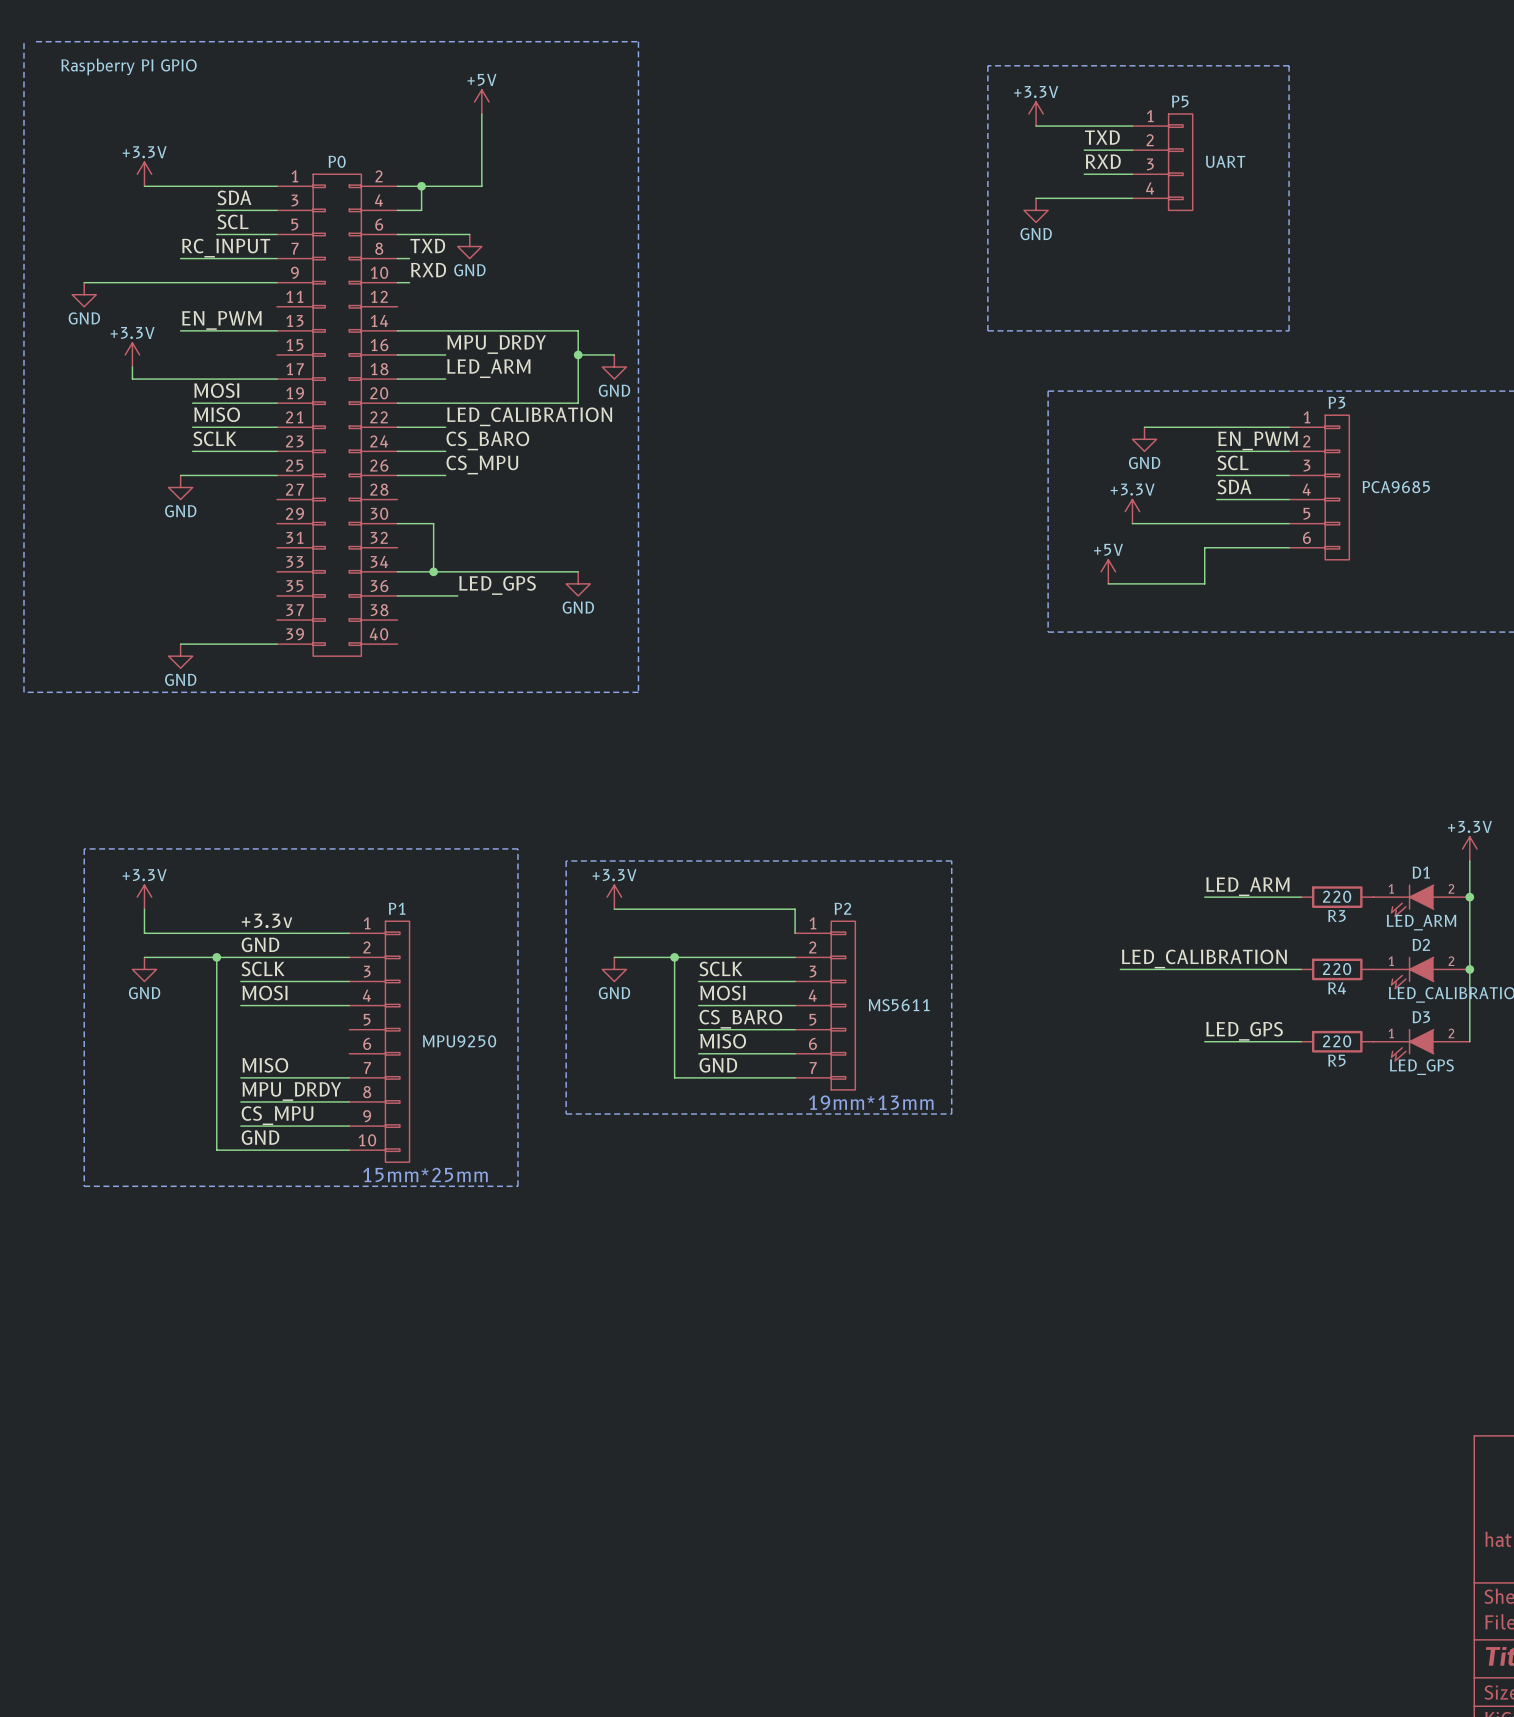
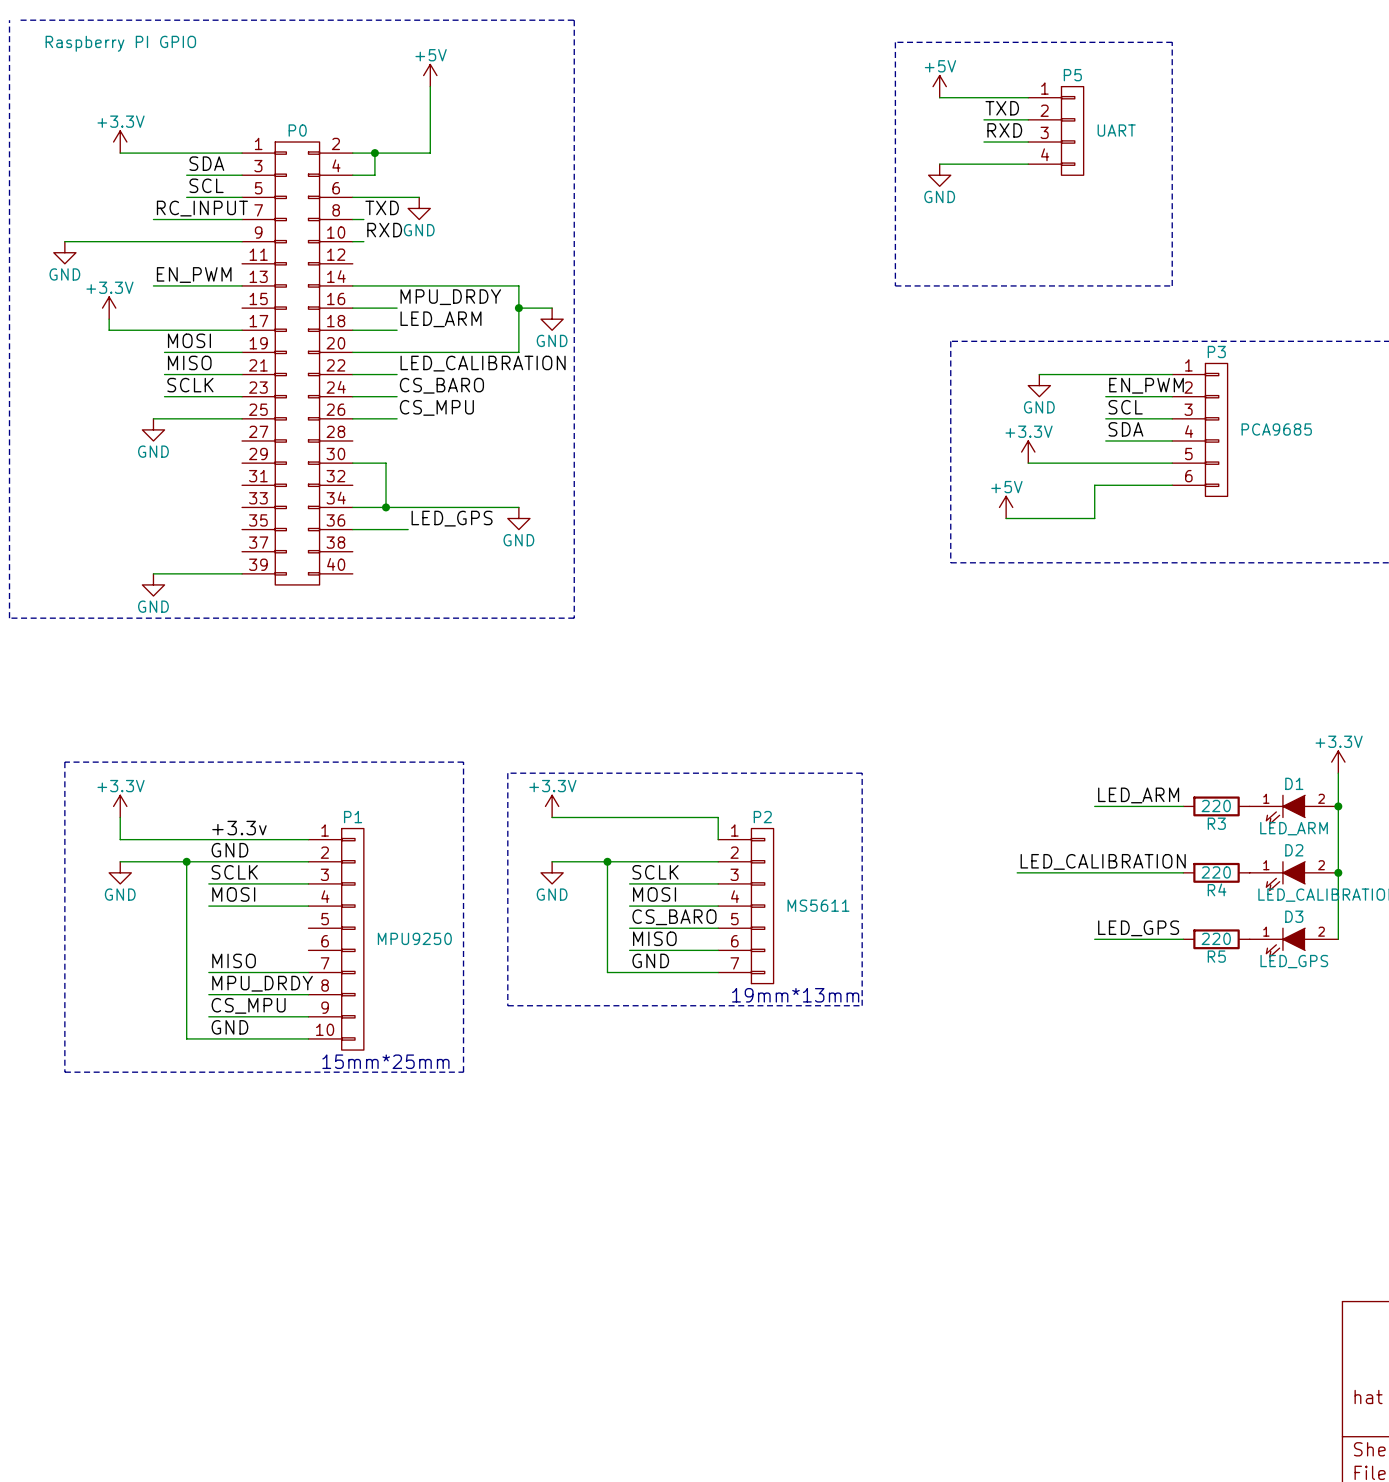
power symbol: +3.3V (1036, 114) -> +5V (939, 86)

